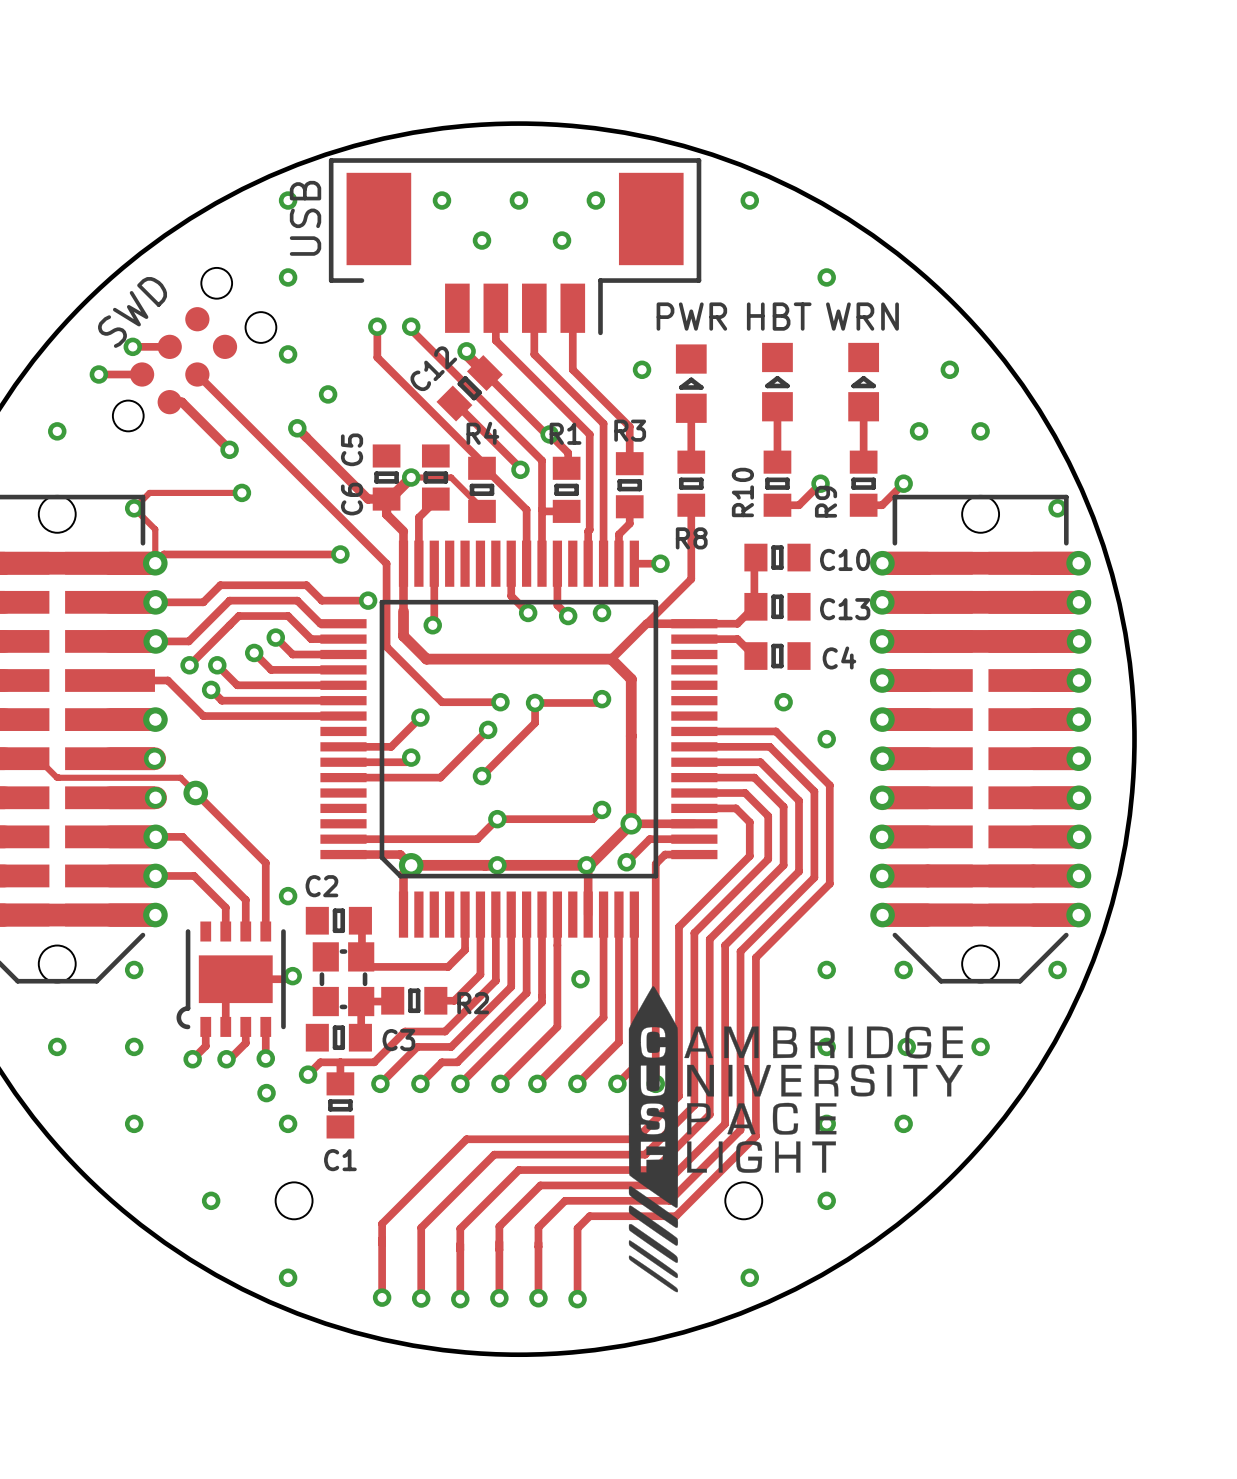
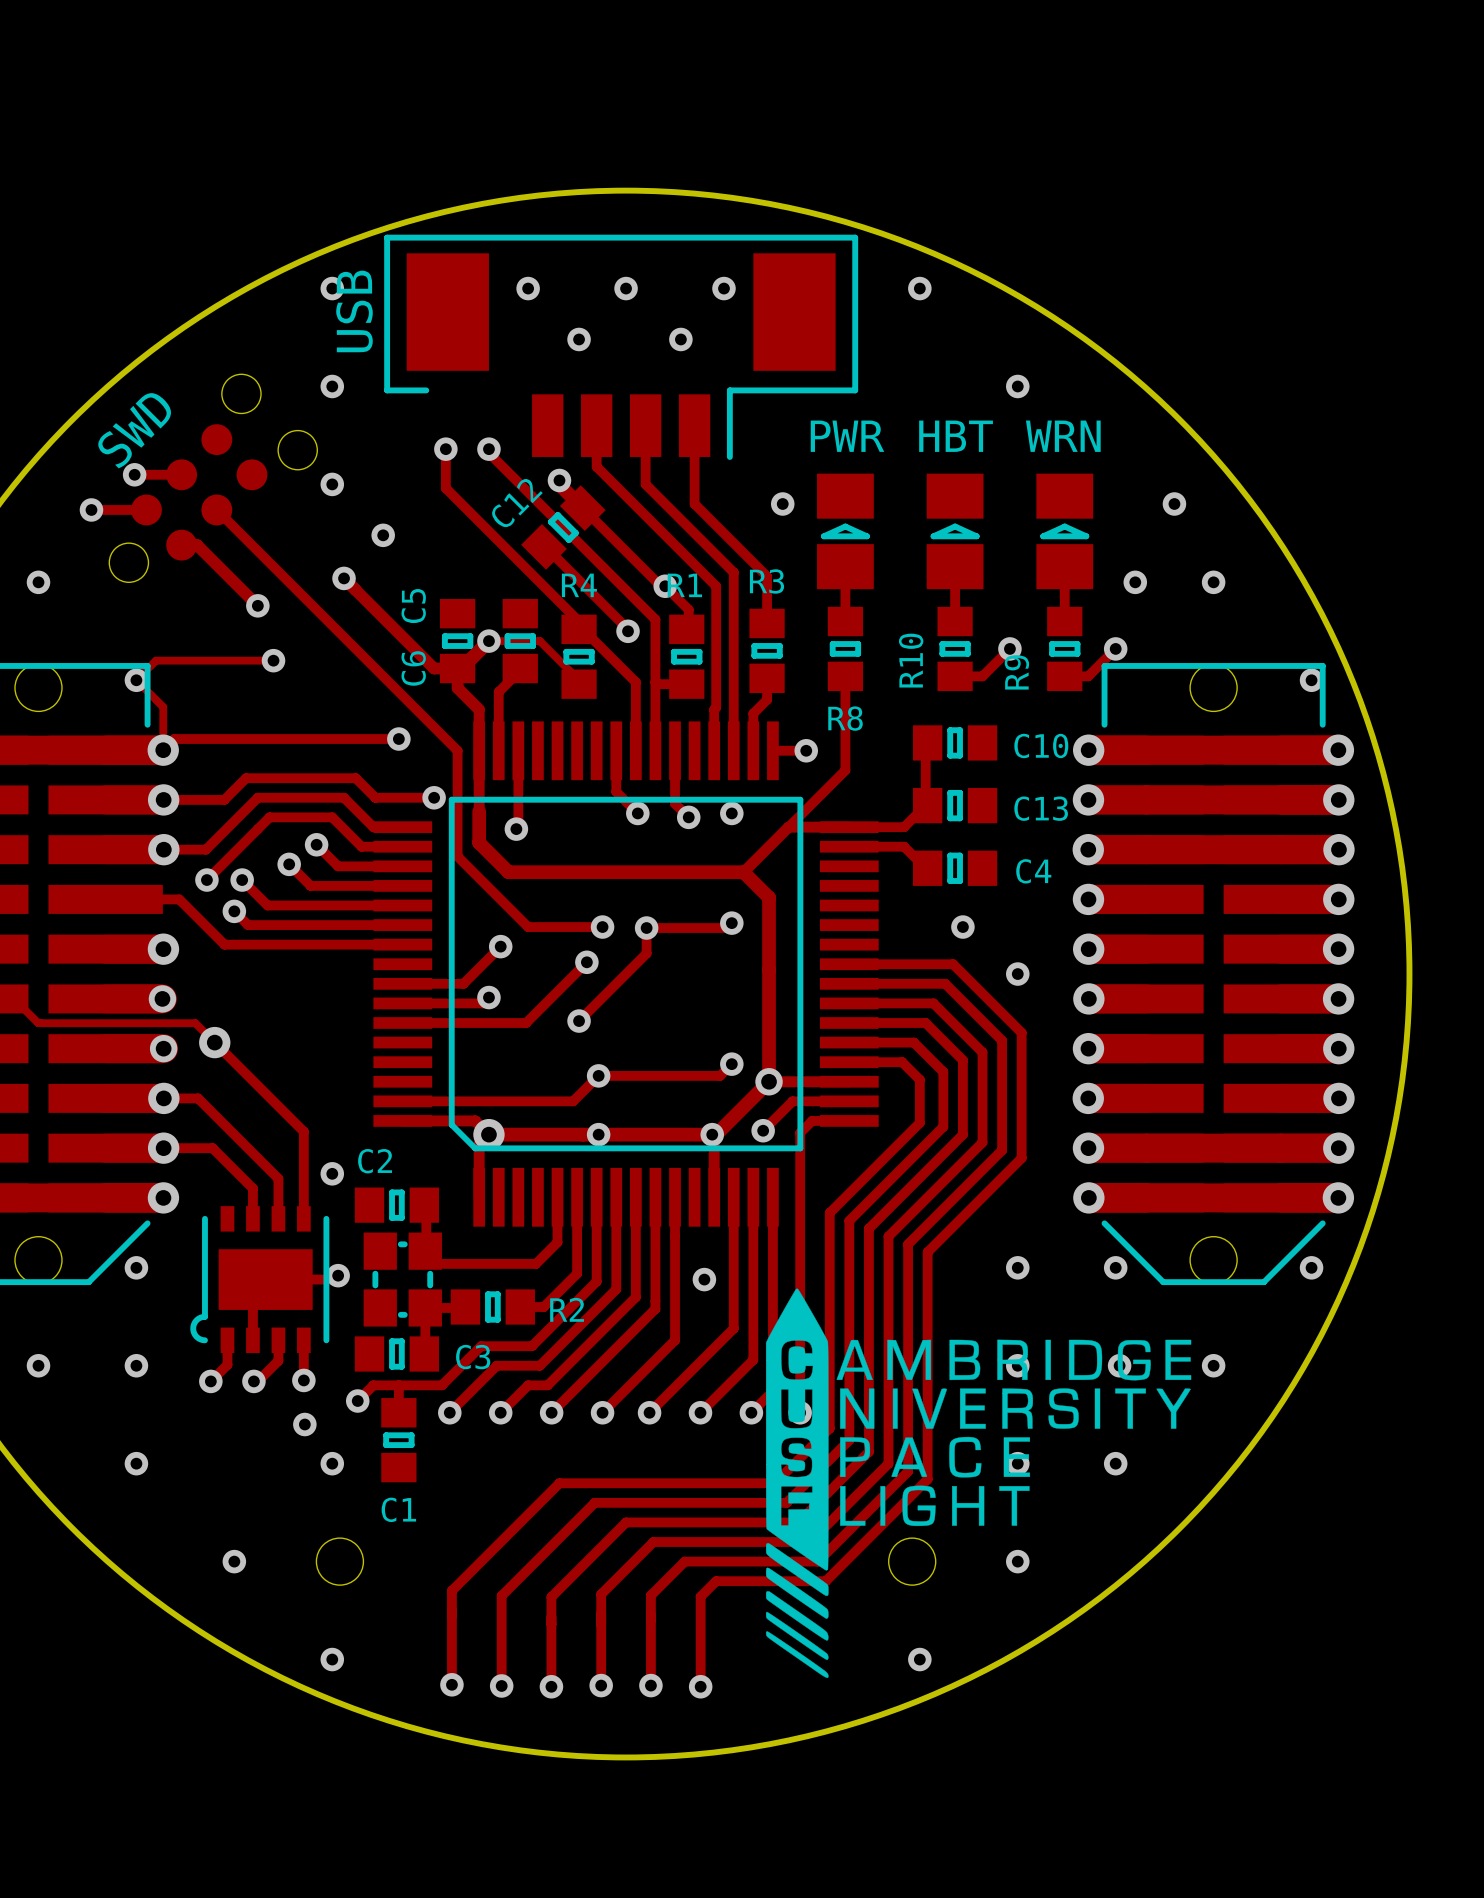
part footprint: [762, 342, 793, 422] -> [926, 473, 984, 590]
part footprint: [848, 342, 880, 422] -> [1036, 473, 1094, 590]
part footprint: [675, 344, 707, 423] -> [817, 473, 874, 590]

